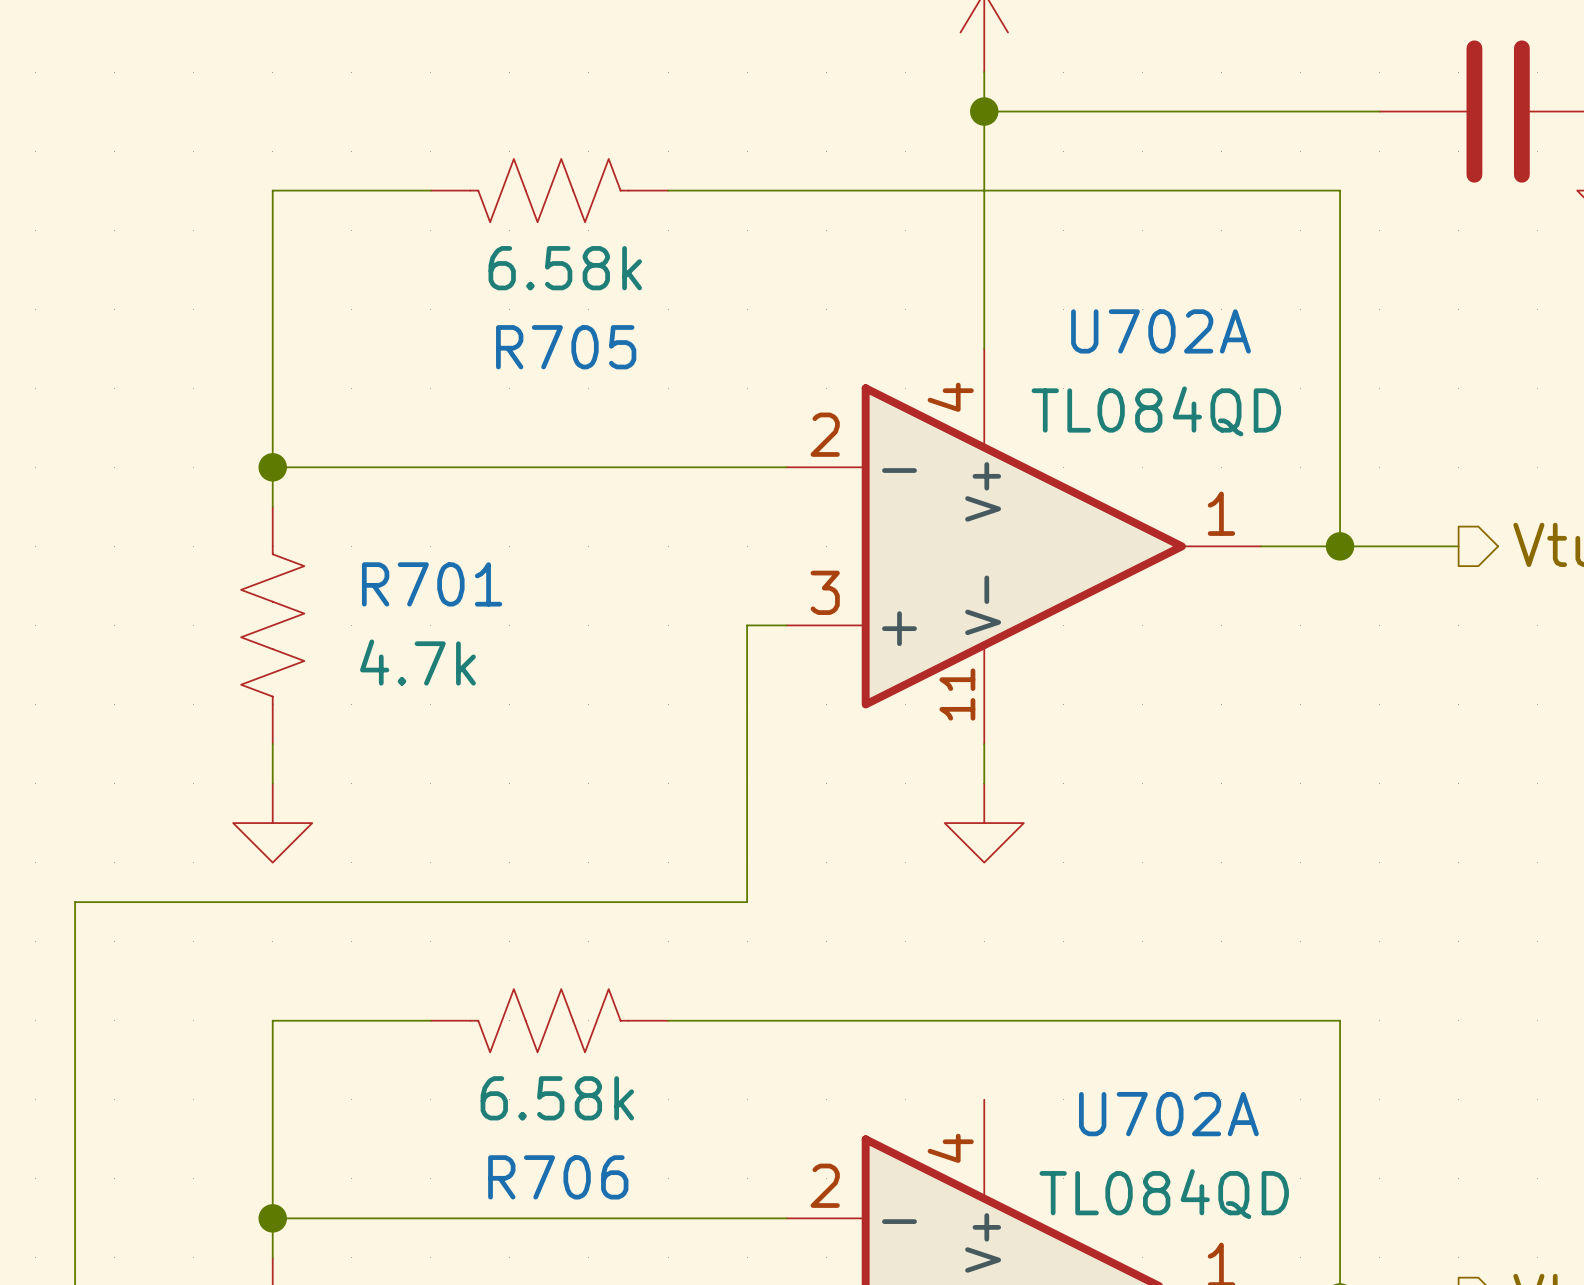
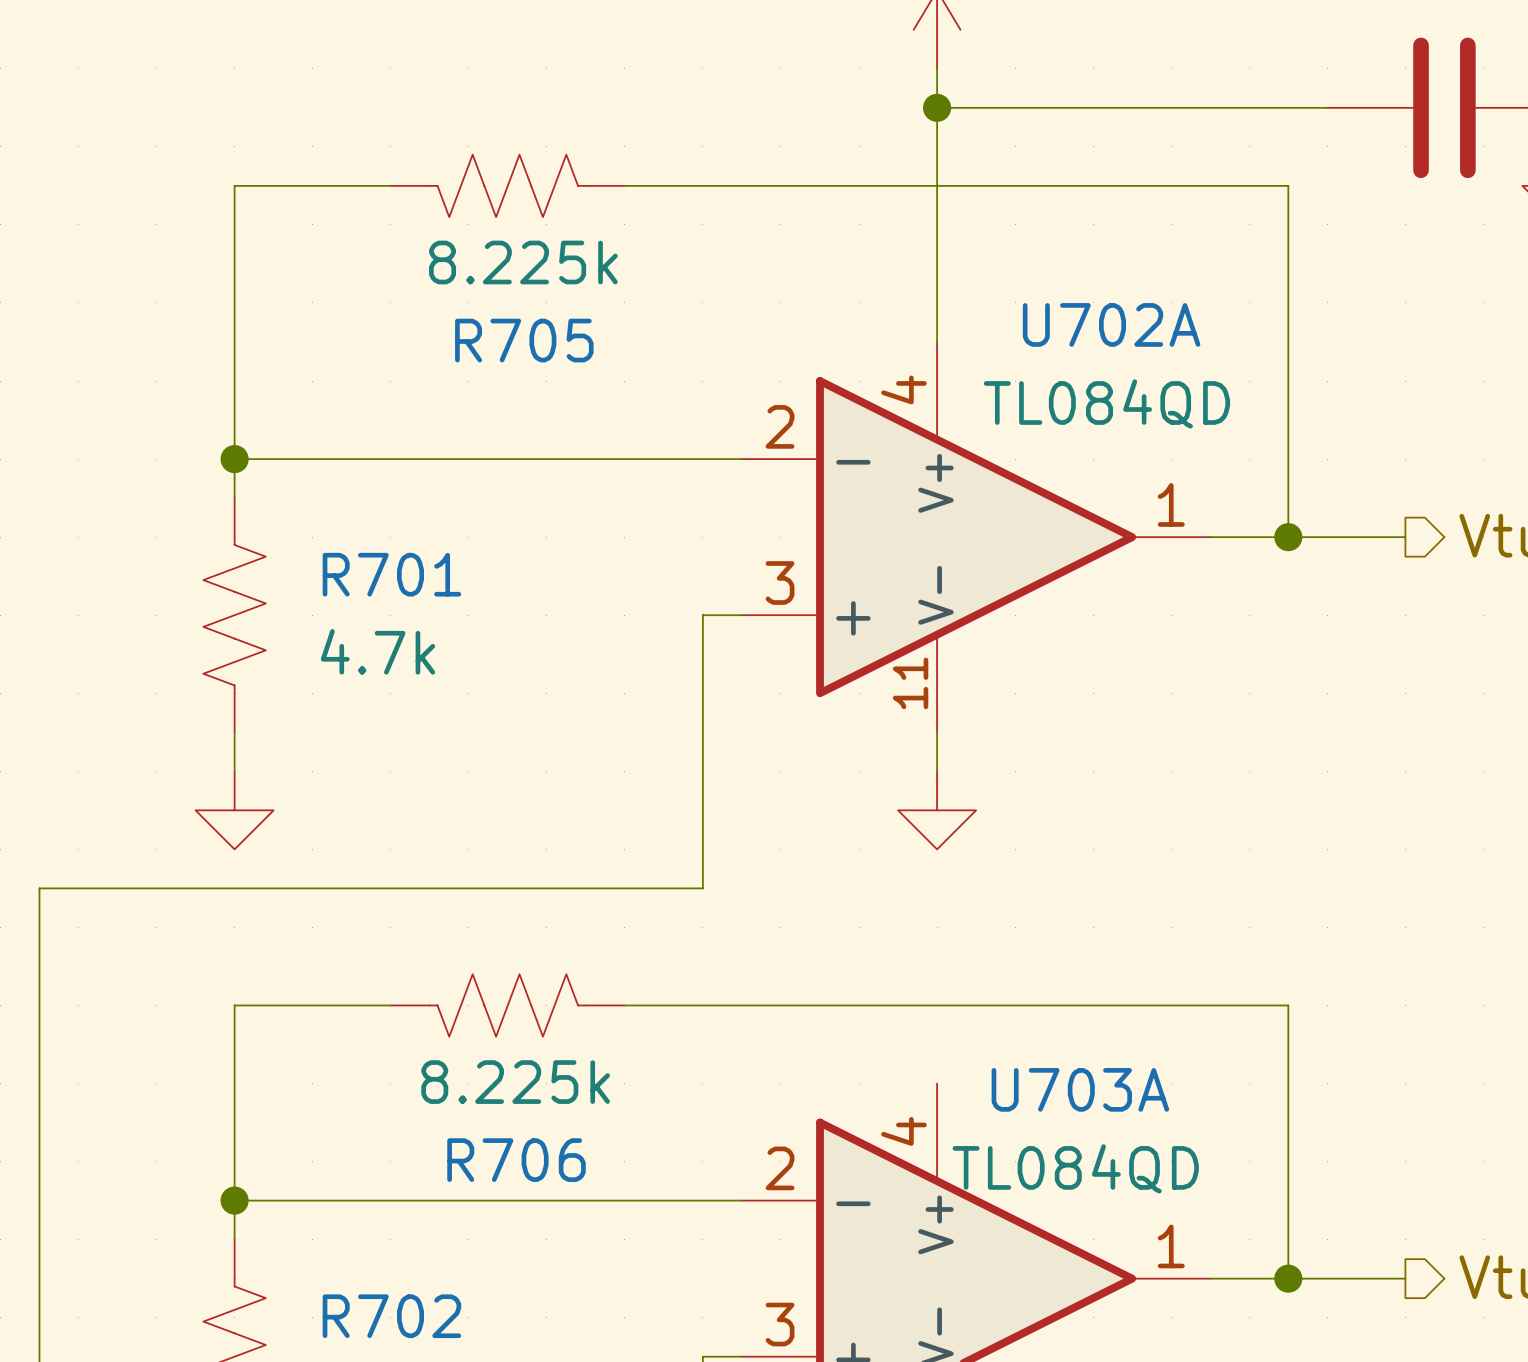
R705 value: 6.58k (565, 268) -> 8.225k (523, 262)
R706 value: 6.58k (557, 1098) -> 8.225k (515, 1082)
U702A name: U702A (1168, 1114) -> U703A (1080, 1089)
U702A value position: TL084QD (1164, 1194) -> TL084QD (1075, 1168)

